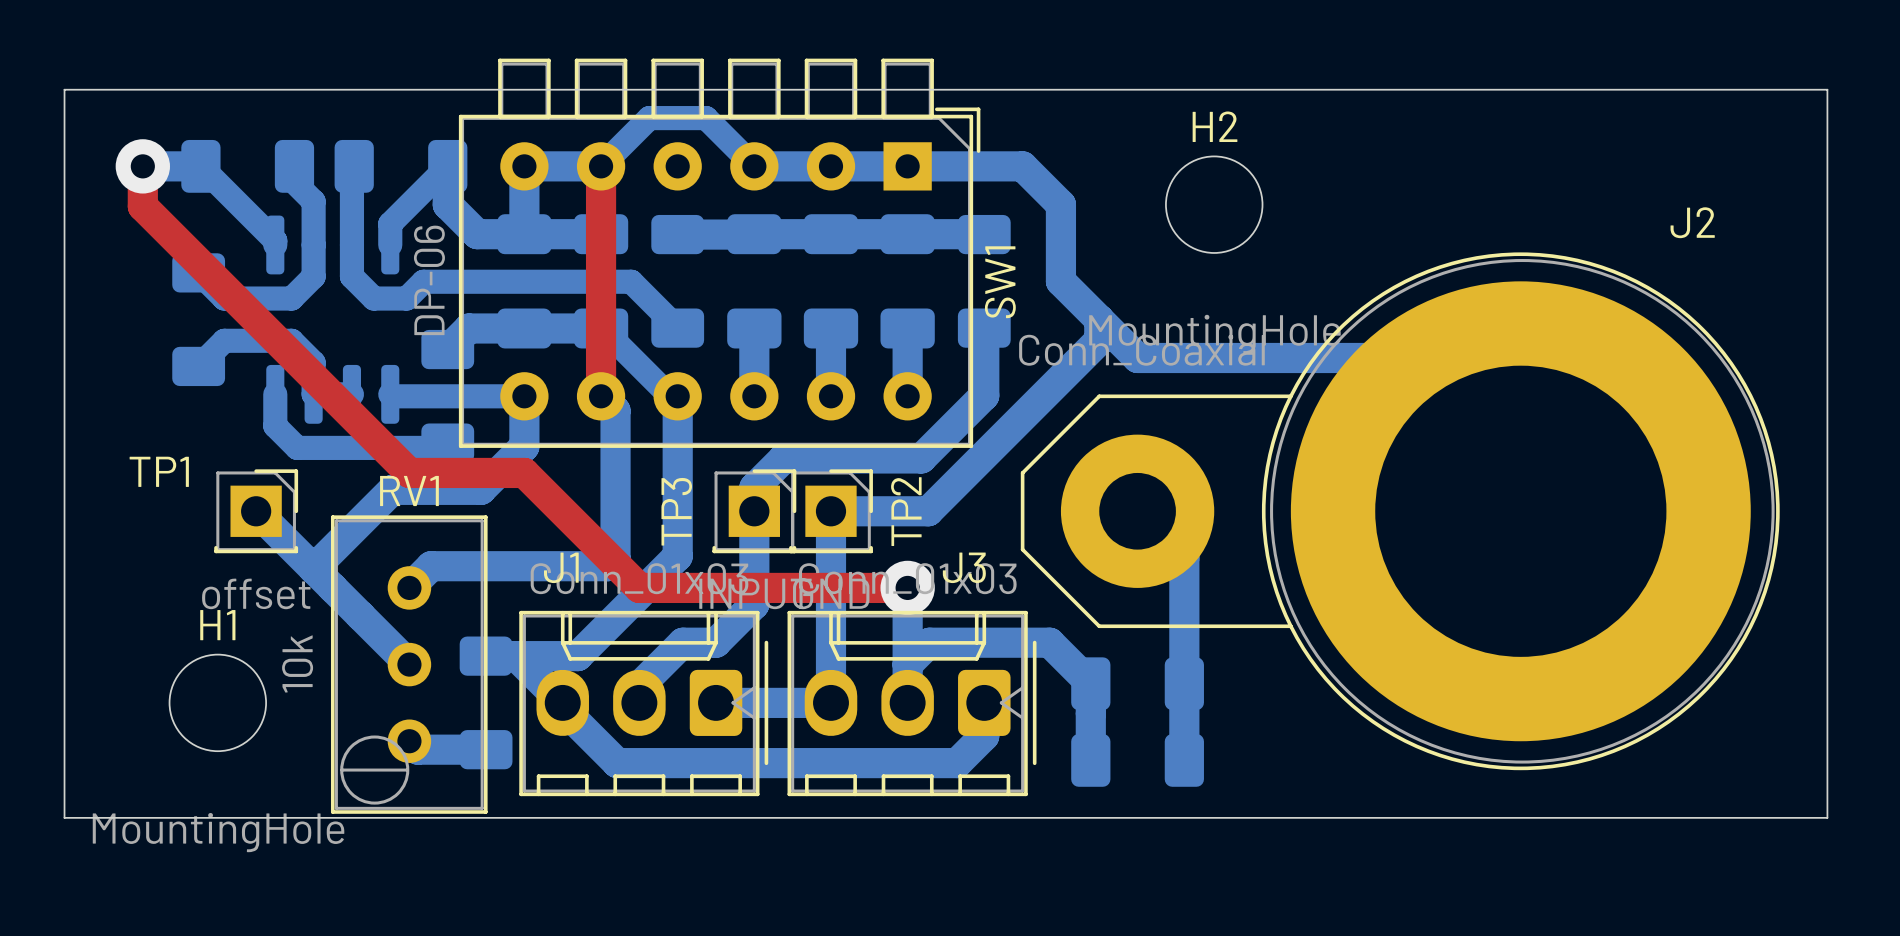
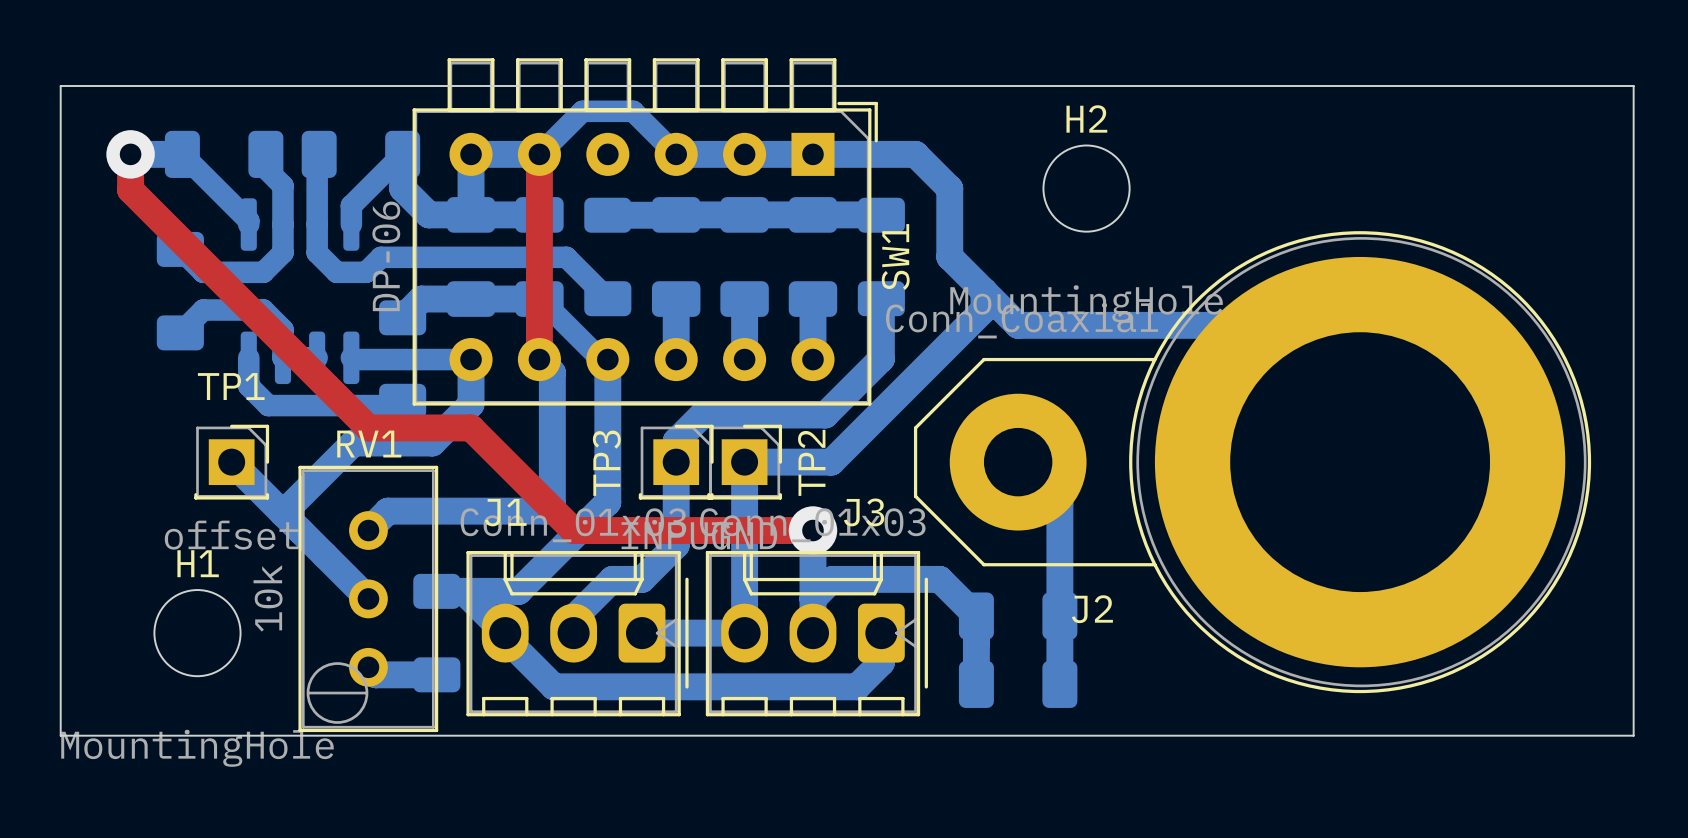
J2 name position: J2 (1692, 222) -> J2 (1092, 609)
TP1 name position: TP1 (159, 471) -> TP1 (231, 386)

